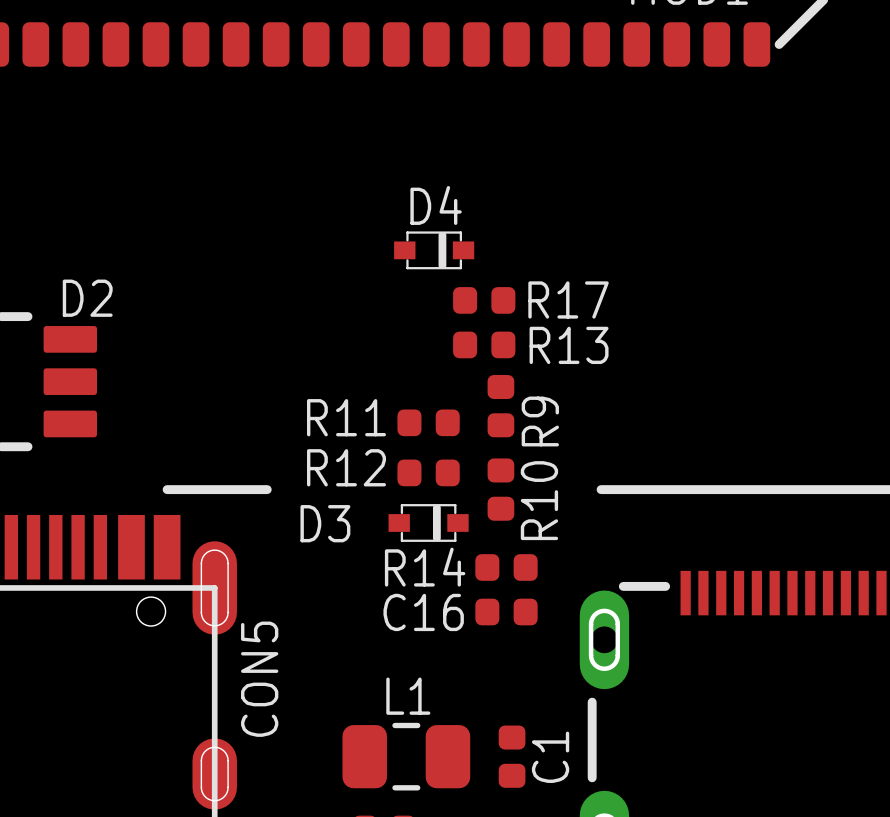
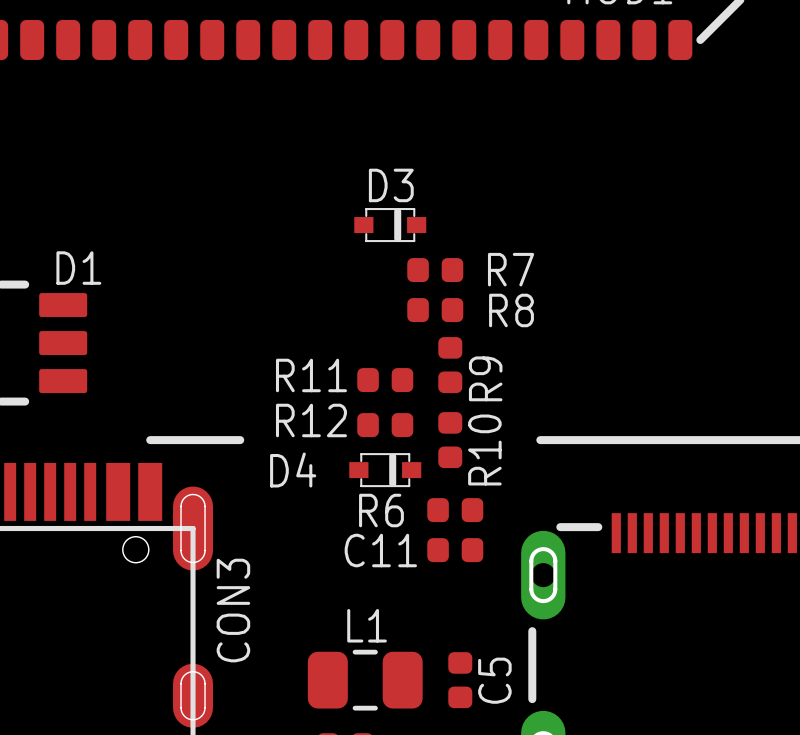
D4 name: D4 (436, 205) -> D3 (391, 185)
D2 name: D2 (87, 298) -> D1 (78, 268)
R17 name: R17 (568, 299) -> R7 (511, 269)
R13 name: R13 (569, 345) -> R8 (511, 310)
D3 name: D3 (325, 523) -> D4 (293, 470)
R14 name: R14 (425, 567) -> R6 (381, 510)
C16 name: C16 (423, 612) -> C11 (380, 550)
CON5 name: CON5 (259, 679) -> CON3 (233, 610)
C1 name: C1 (550, 757) -> C5 (494, 680)

